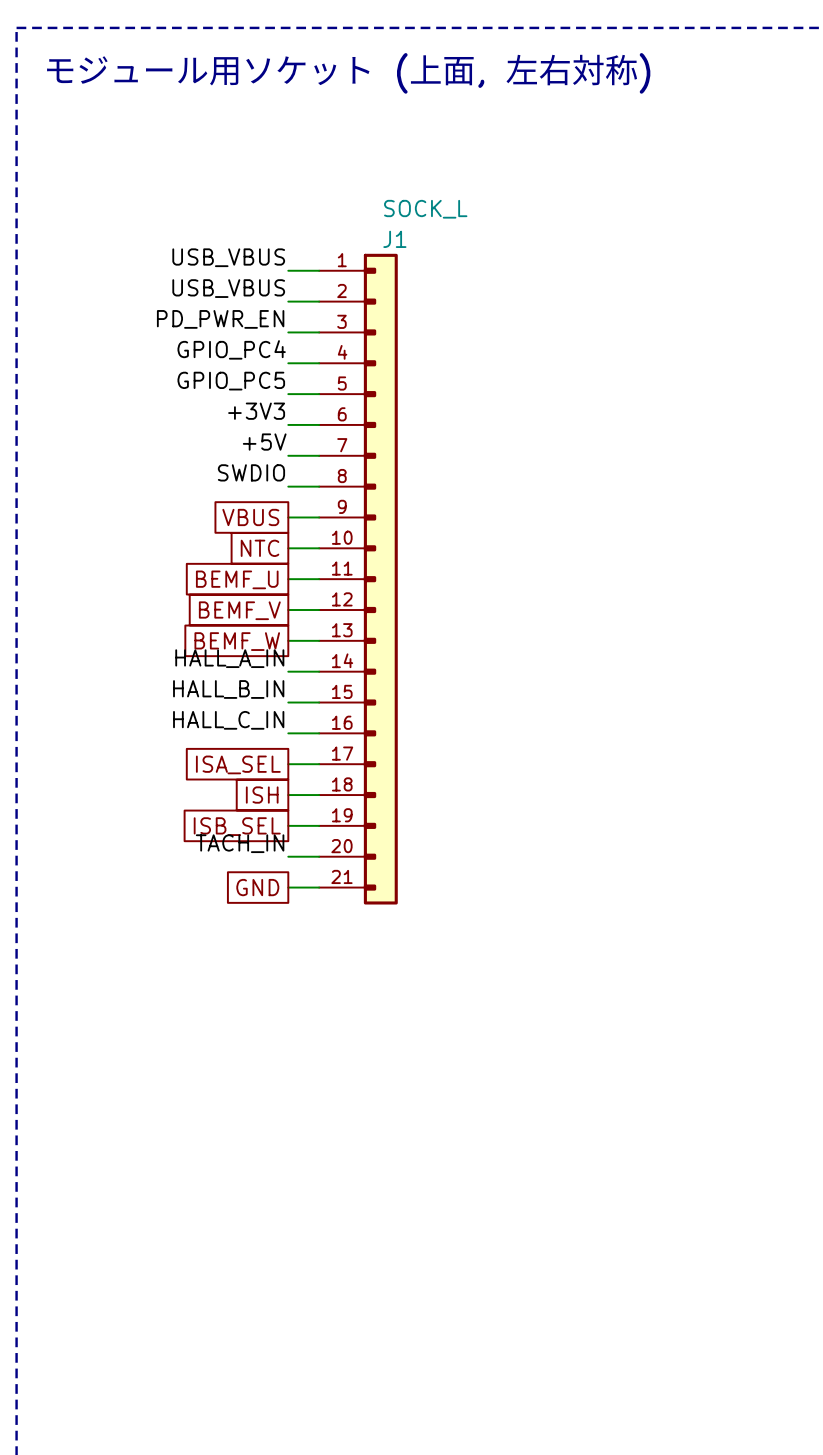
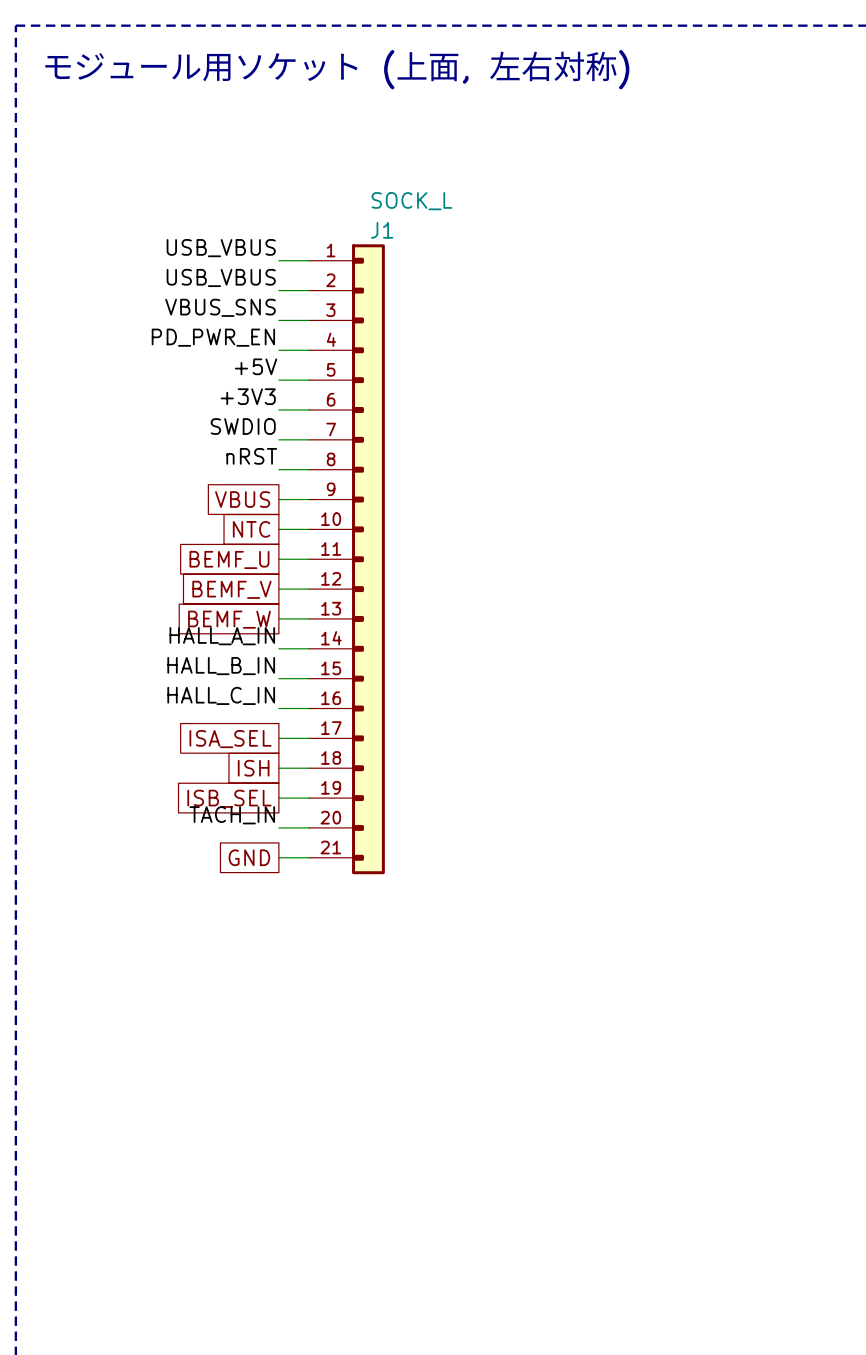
label: PD_PWR_EN (220, 319) -> VBUS_SNS (220, 307)
label: GPIO_PC4 (231, 349) -> PD_PWR_EN (213, 337)
label: GPIO_PC5 (231, 381) -> +5V (256, 366)
label: +5V (264, 442) -> SWDIO (243, 426)
label: SWDIO (251, 472) -> nRST (251, 456)

